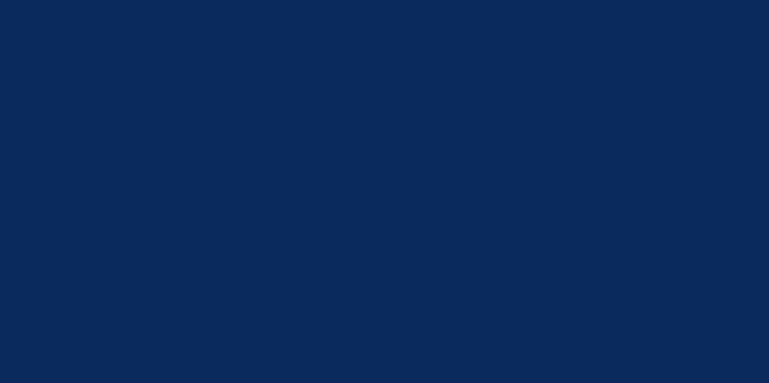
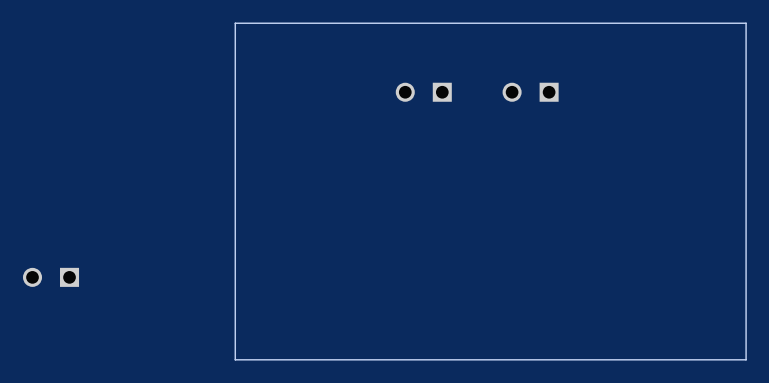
board edge: none -> (746, 23) (235, 23) (235, 359) (746, 359) (746, 23)
part: none -> (423, 92)
part: none -> (530, 92)
part: none -> (51, 277)

